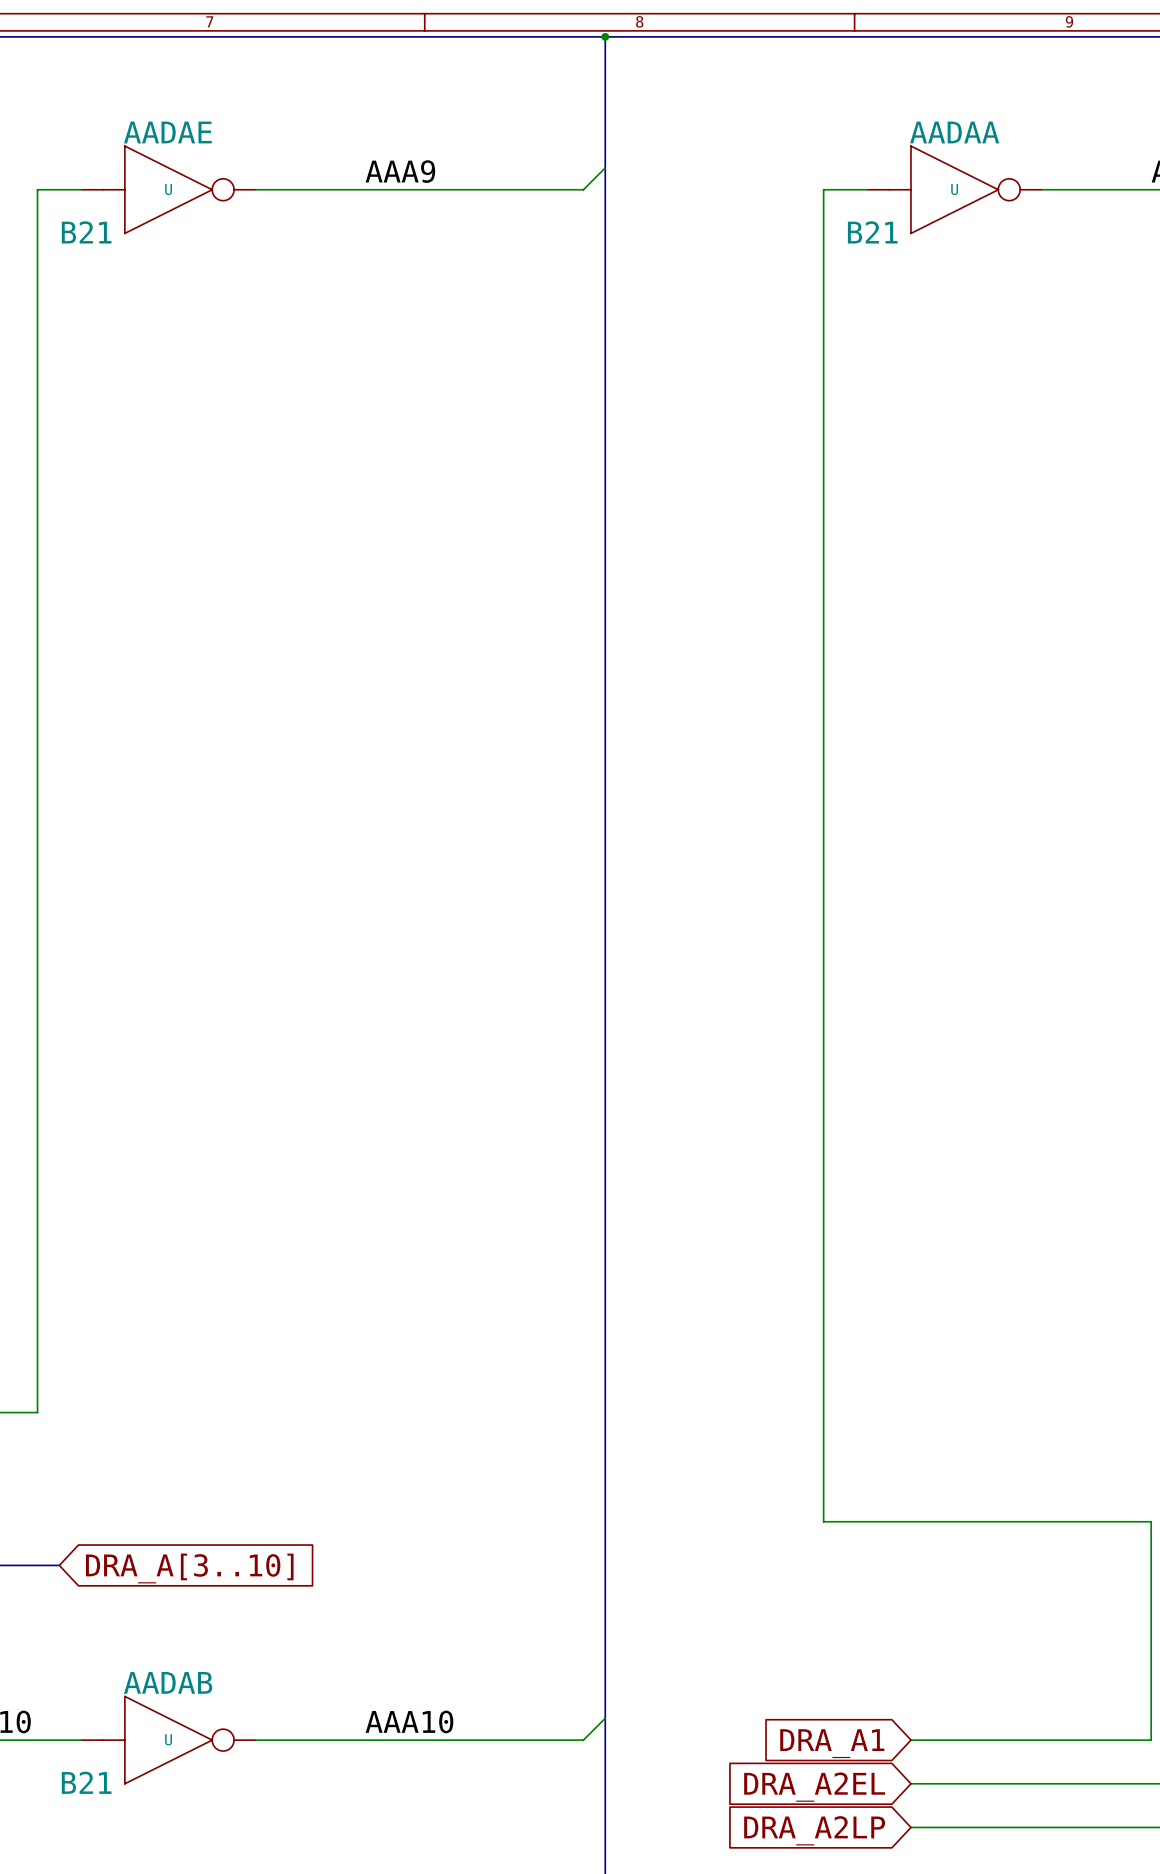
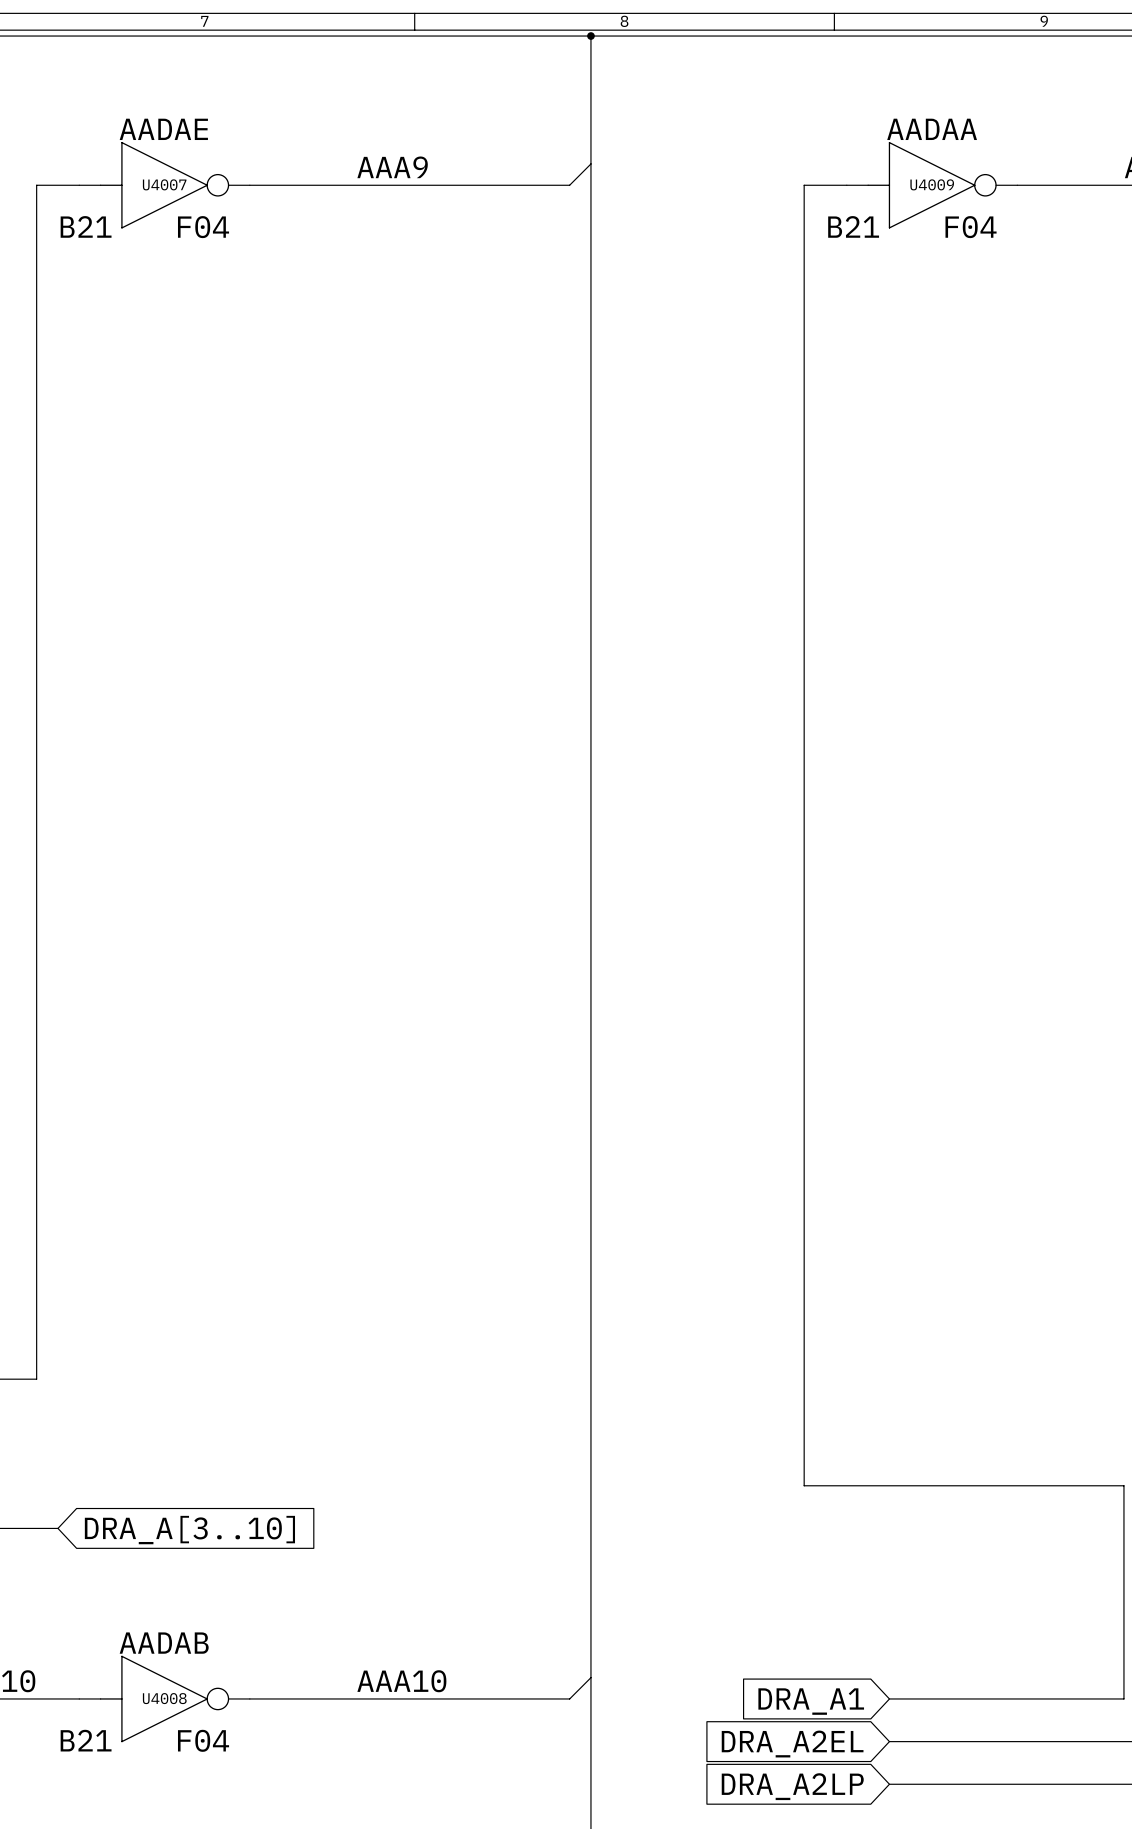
U name: U (168, 189) -> U4007 (164, 184)
U name: U (954, 189) -> U4009 (932, 184)
U value: none -> F04 (203, 227)
U value: none -> F04 (971, 227)
U name: U (168, 1739) -> U4008 (164, 1698)
U value: none -> F04 (203, 1740)

